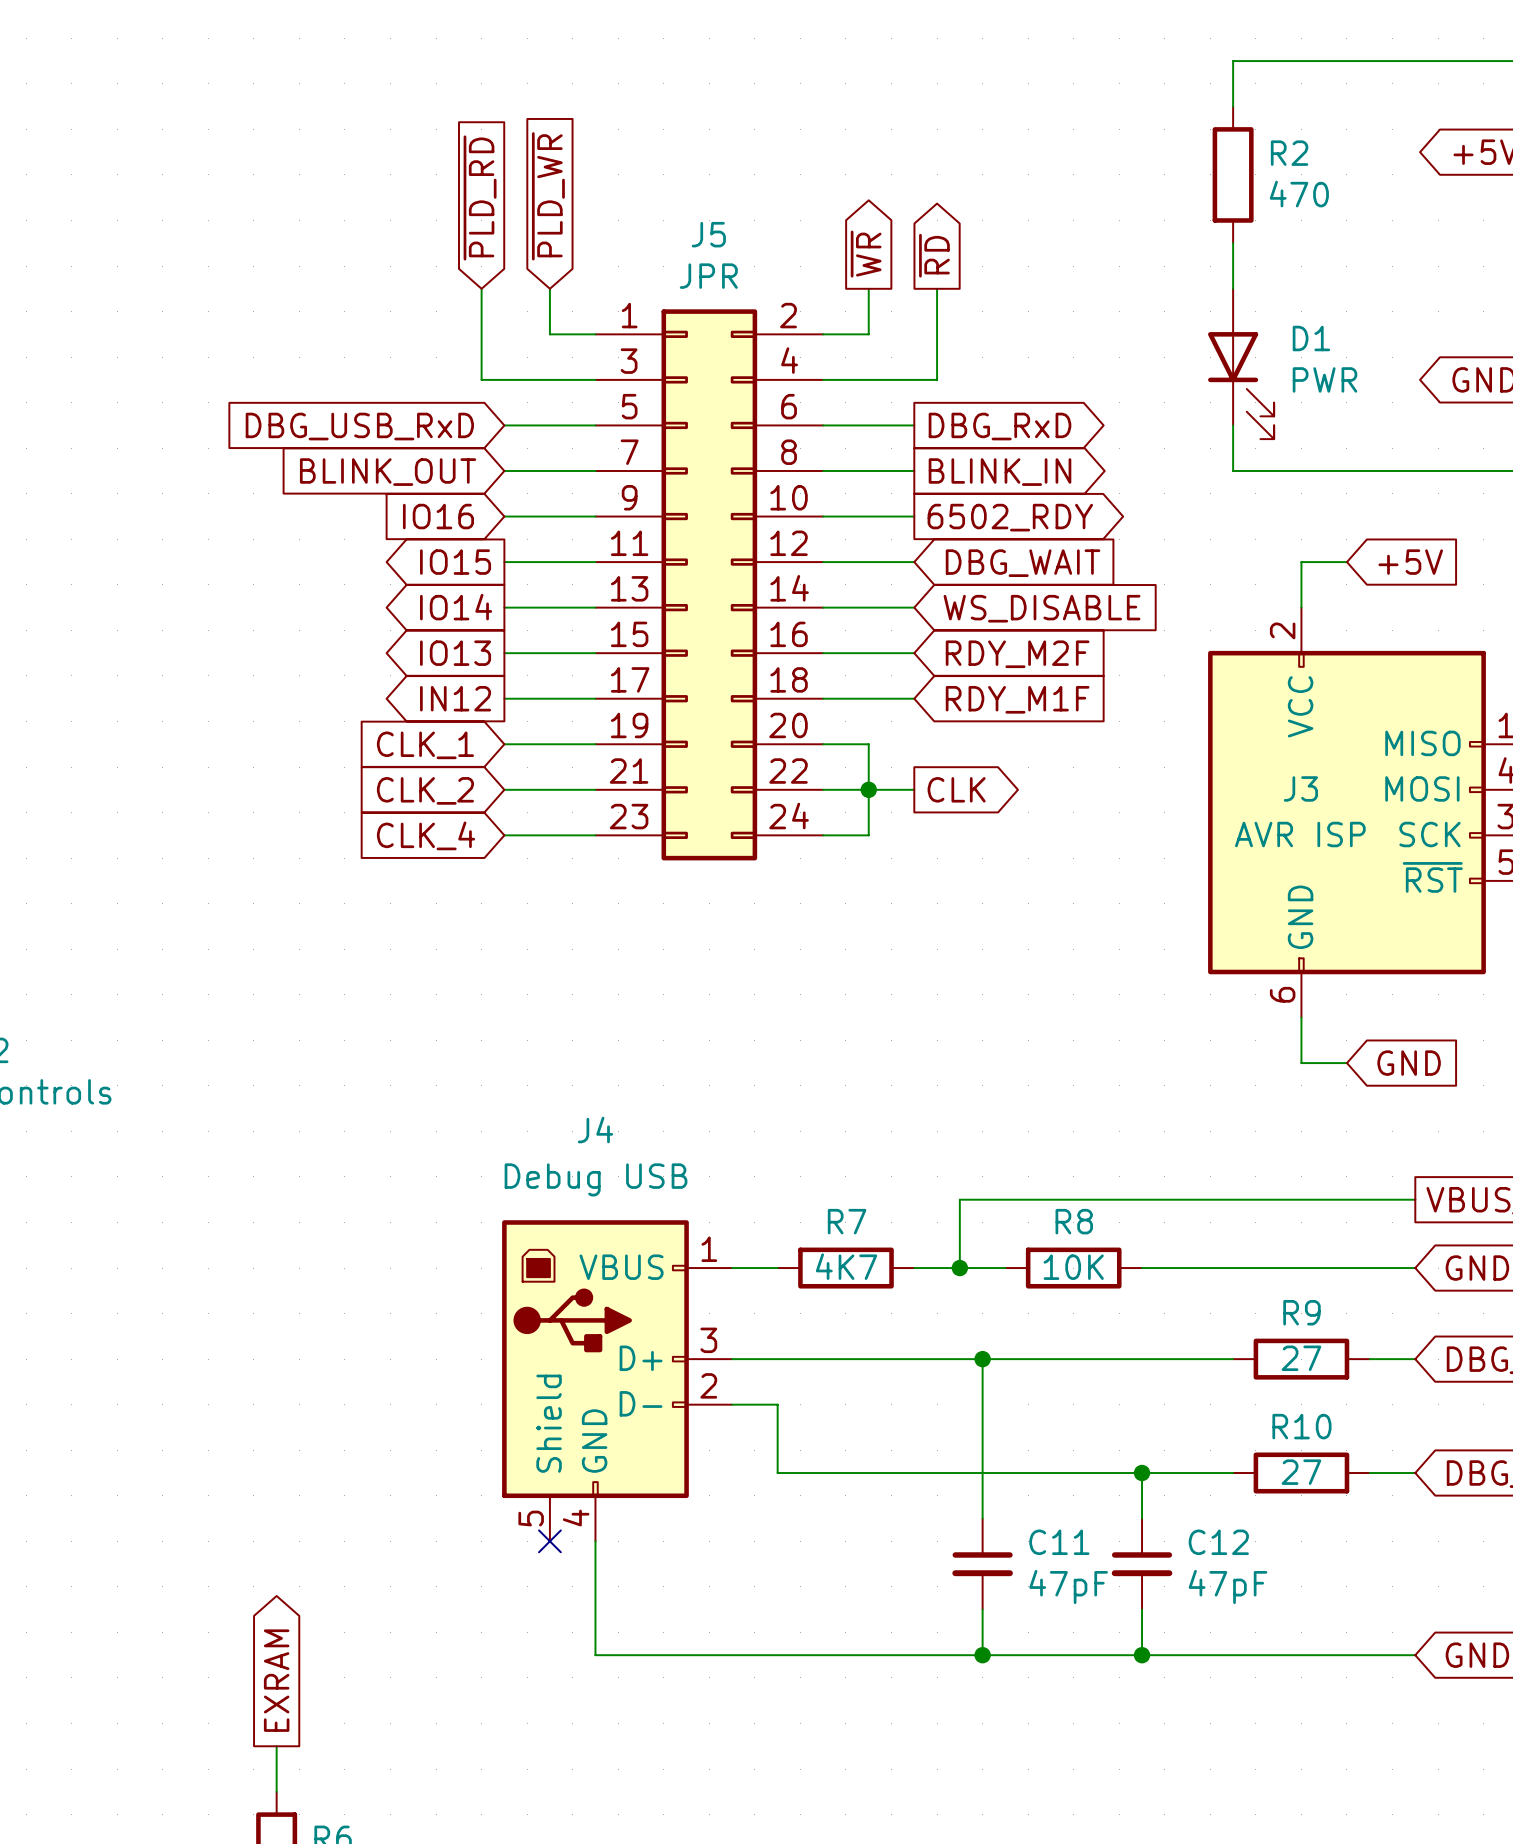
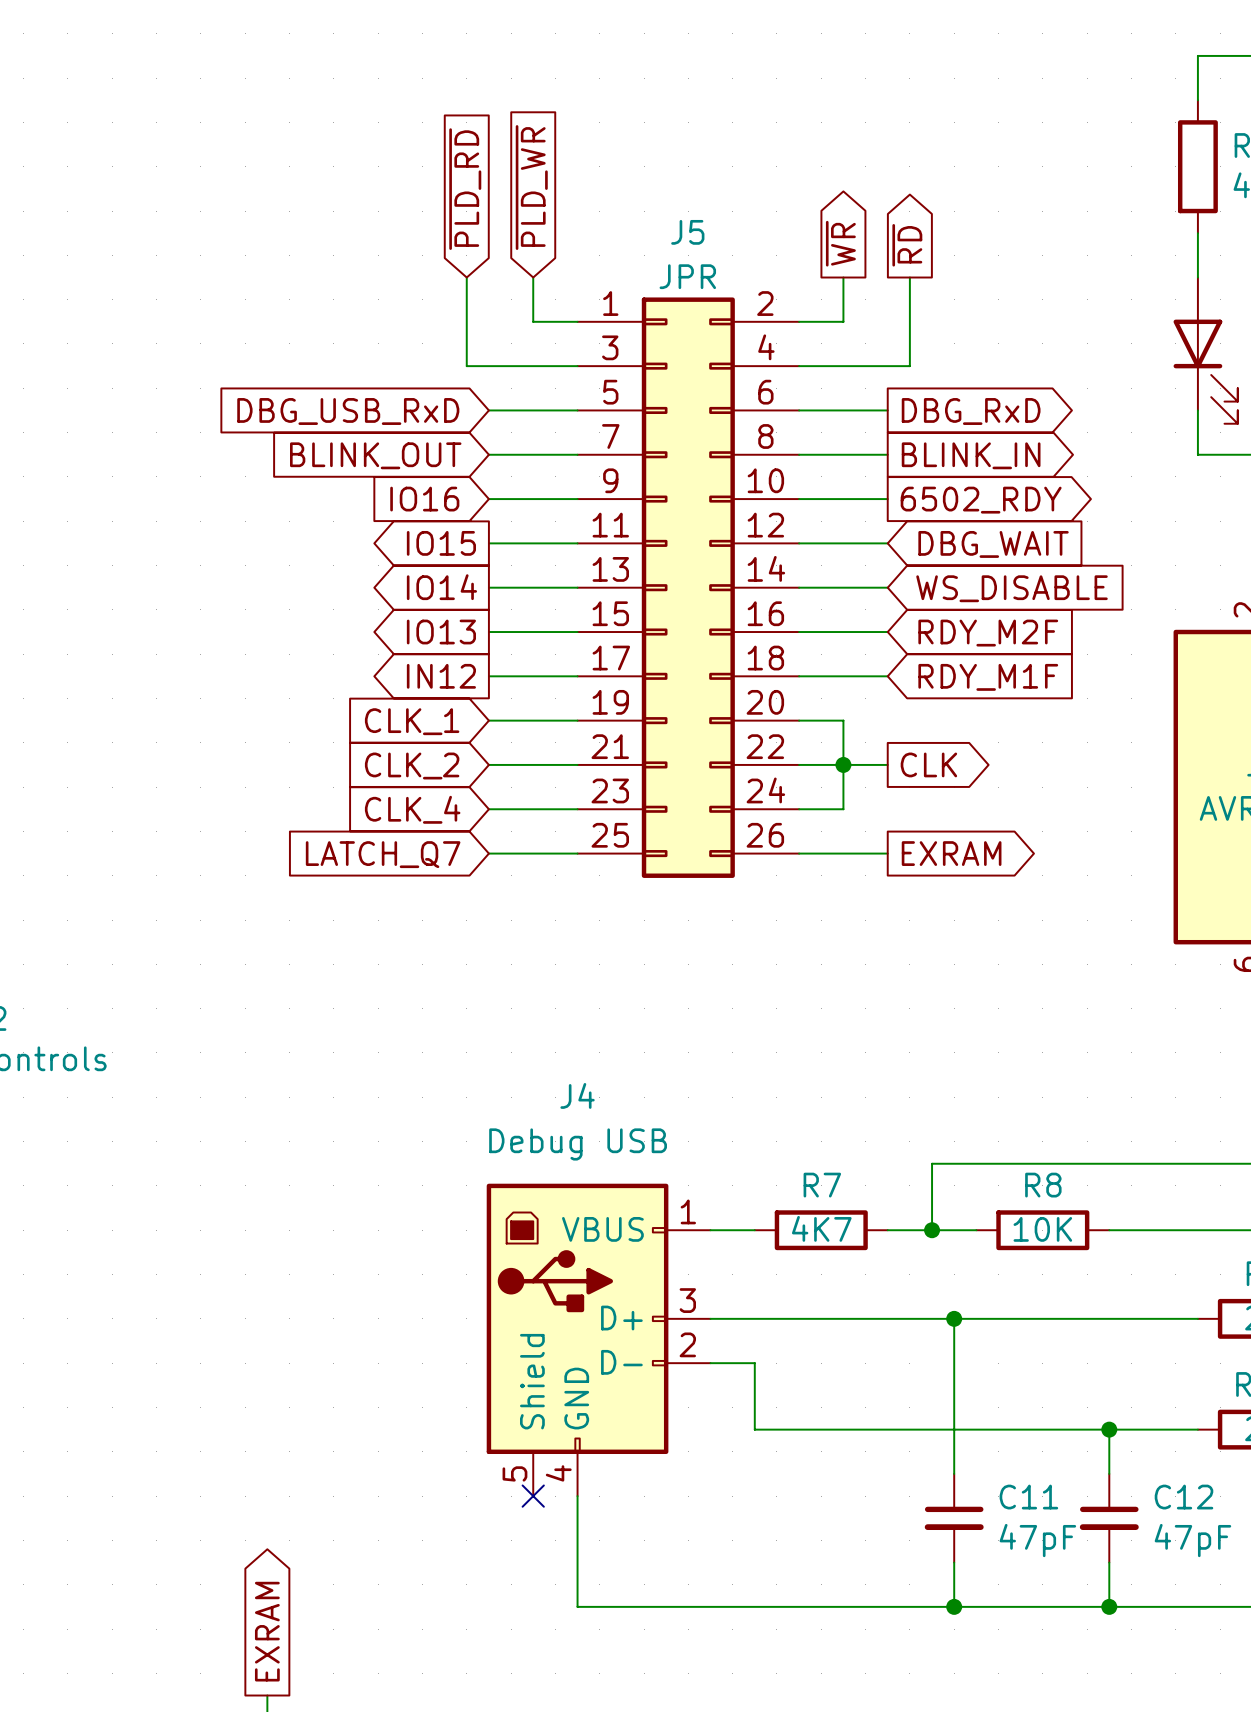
J5 symbol: [595, 309, 824, 861] -> [577, 297, 800, 878]
wire: none -> (488, 853) (577, 853)
wire: none -> (799, 853) (887, 853)
global label: none -> EXRAM (951, 853)
global label: none -> LATCH_Q7 (383, 854)

